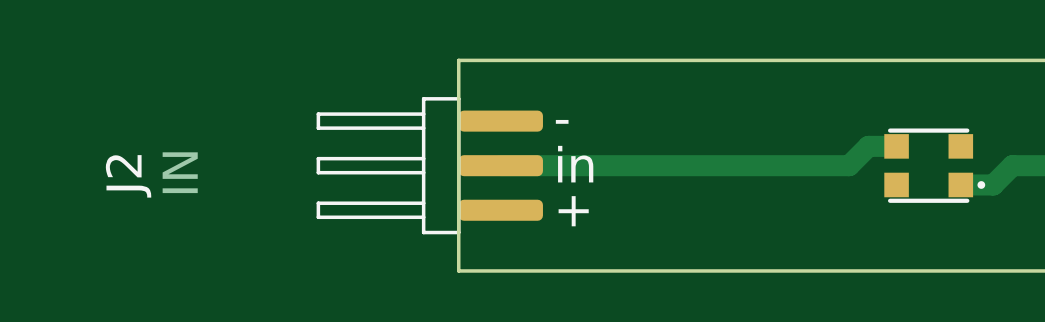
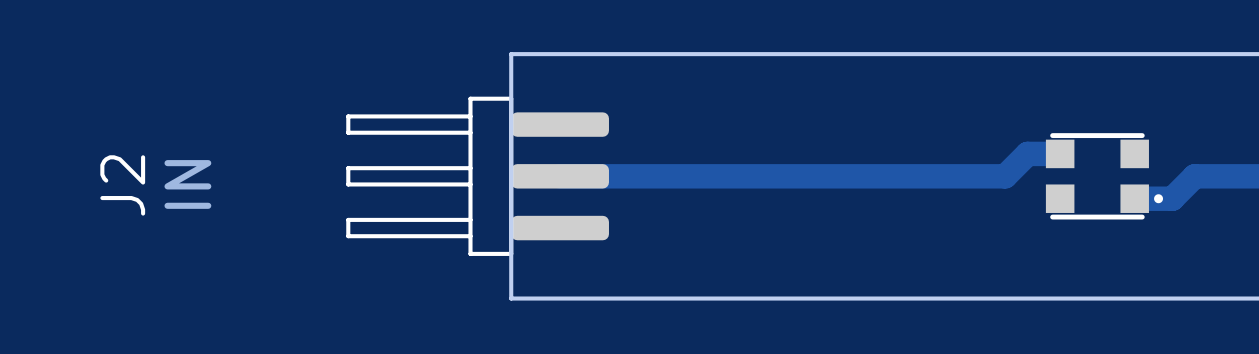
board edge: (458, 60) (458, 270) -> (551, 54) (511, 54) (511, 298) (551, 298)
text: - (562, 121) -> none
text: in (575, 164) -> none
J2 position: (429, 165) -> (477, 176)
text: + (573, 211) -> none

